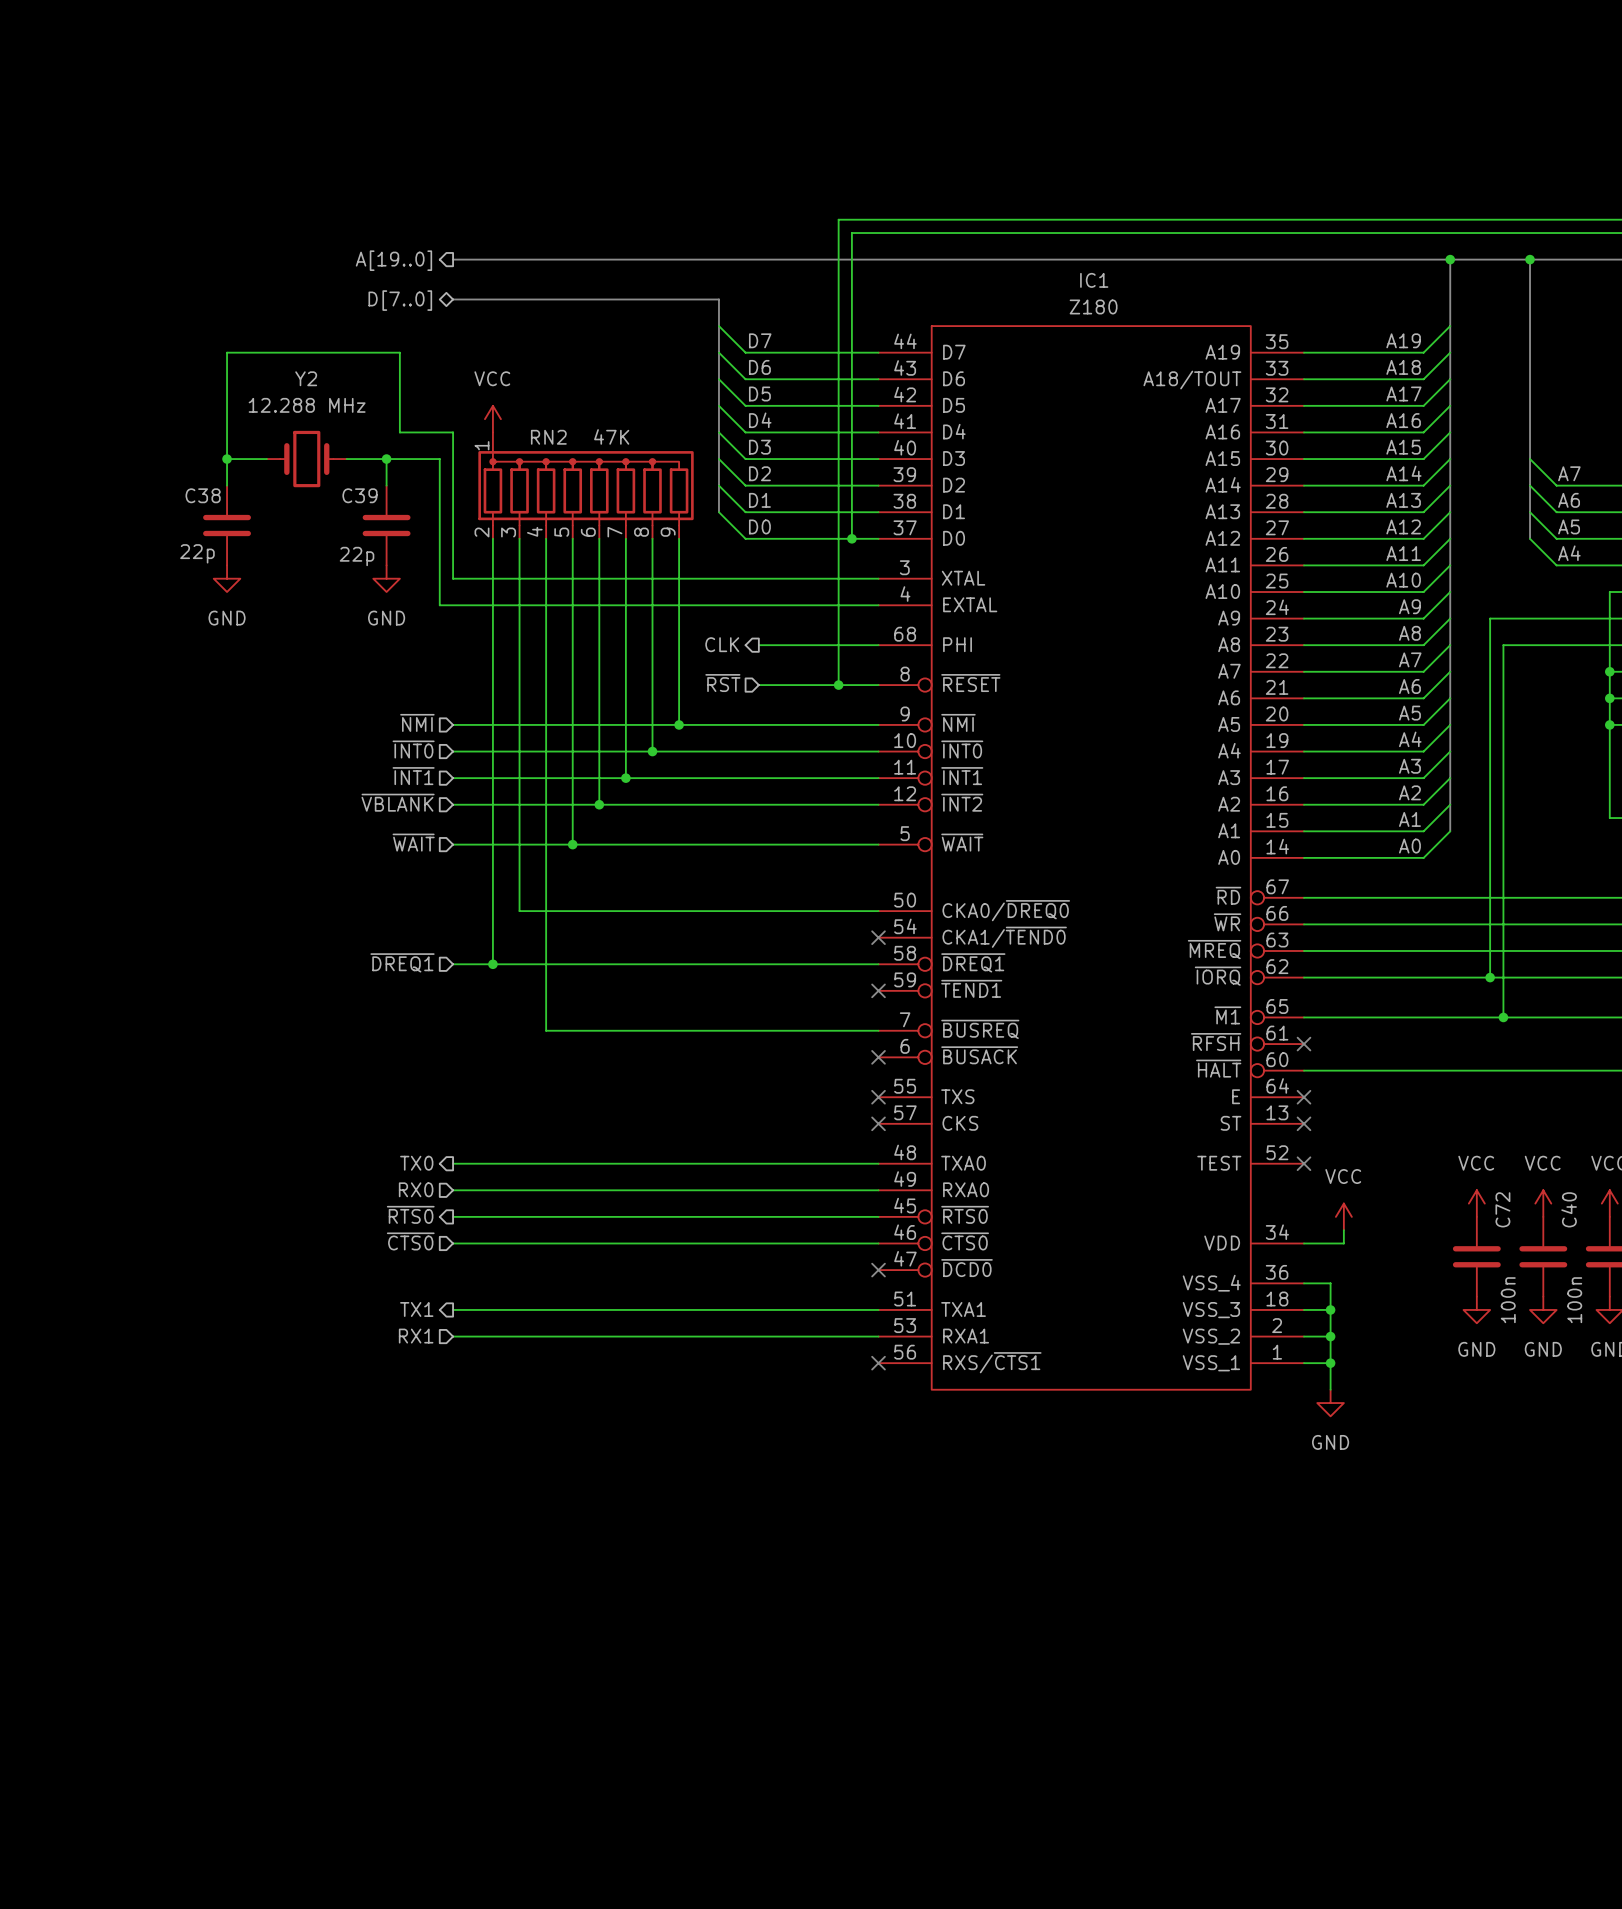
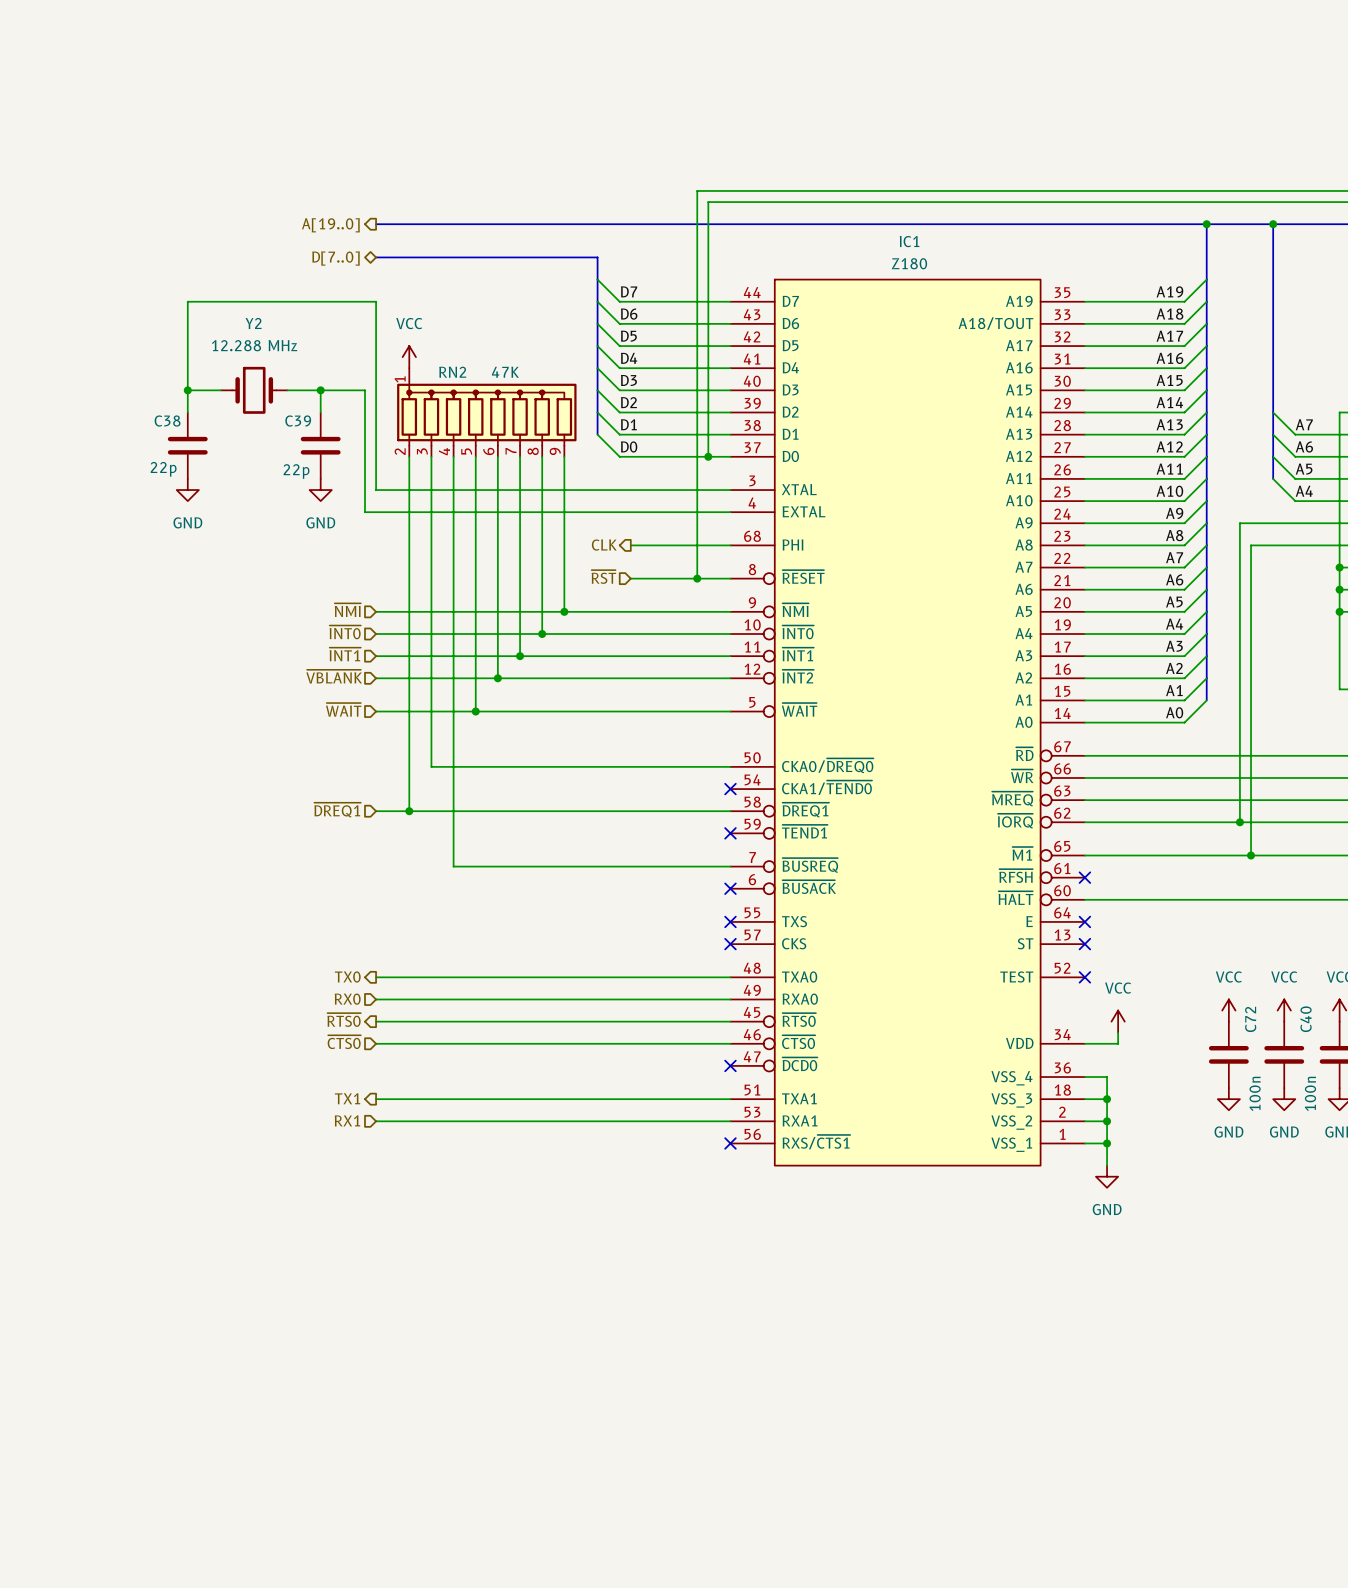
wire: (399, 352) (399, 432) (453, 432) -> (331, 301) (376, 301) (376, 368)
wire: (1530, 459) (1556, 485) (1609, 485) -> (1273, 478) (1295, 501) (1339, 501) (1339, 412)
label: A7 (1569, 473) -> none
label: A6 (1569, 500) -> A7 (1304, 424)
label: A5 (1569, 526) -> A6 (1304, 446)
bus: none -> (1273, 456) (1273, 478)
label: A4 (1569, 553) -> A5 (1304, 469)
label: none -> A4 (1304, 491)

